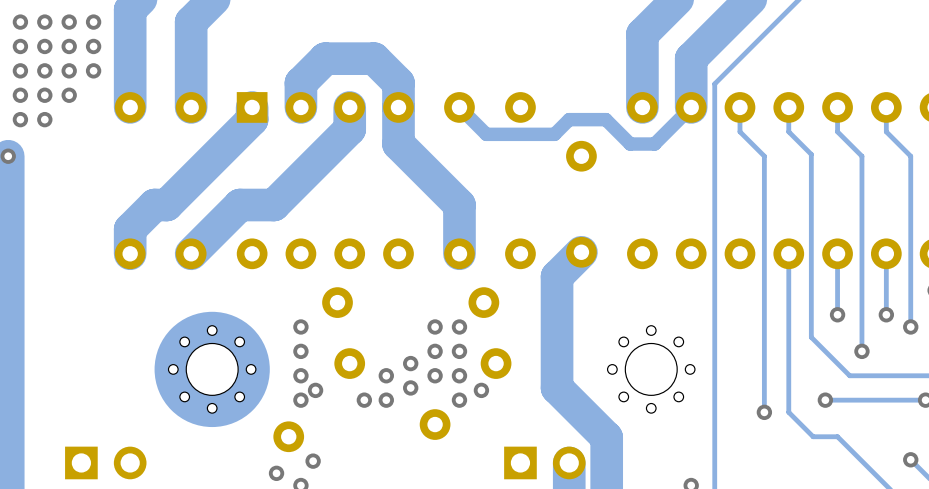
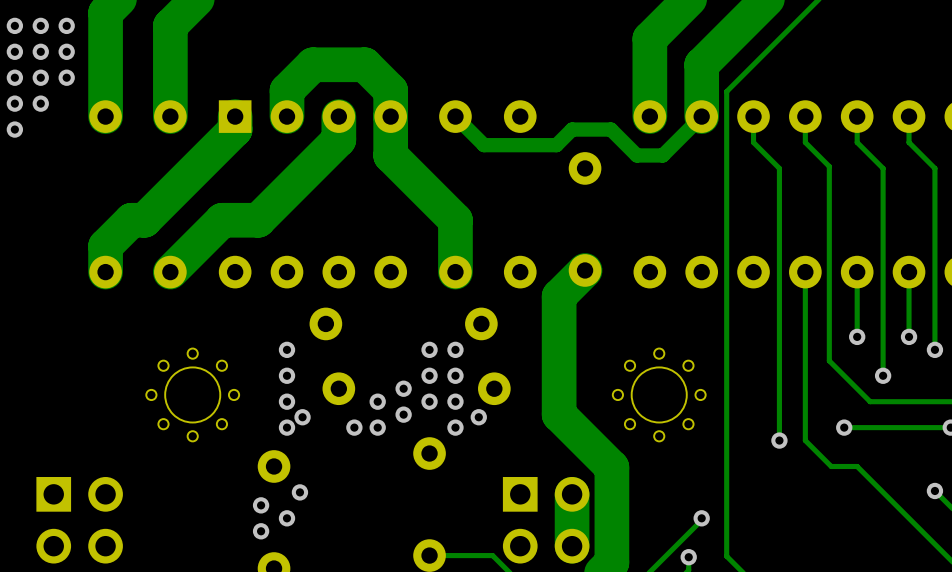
part: (212, 369) -> none

